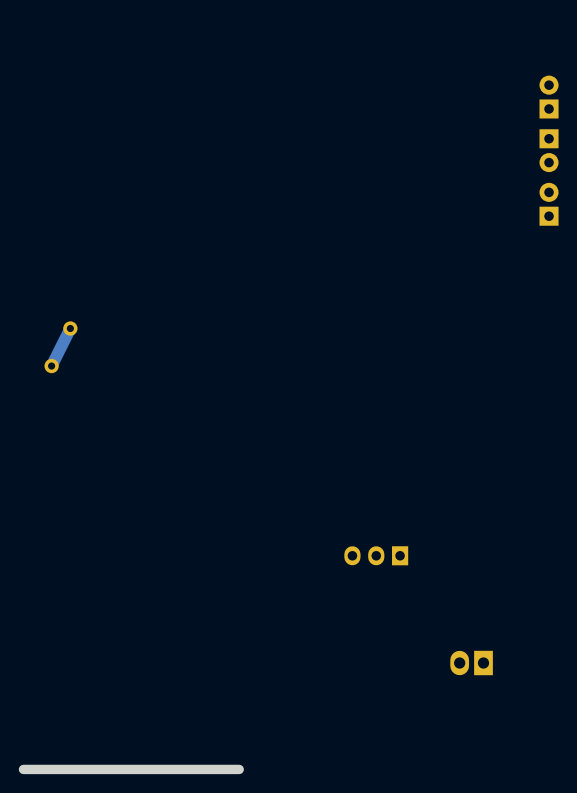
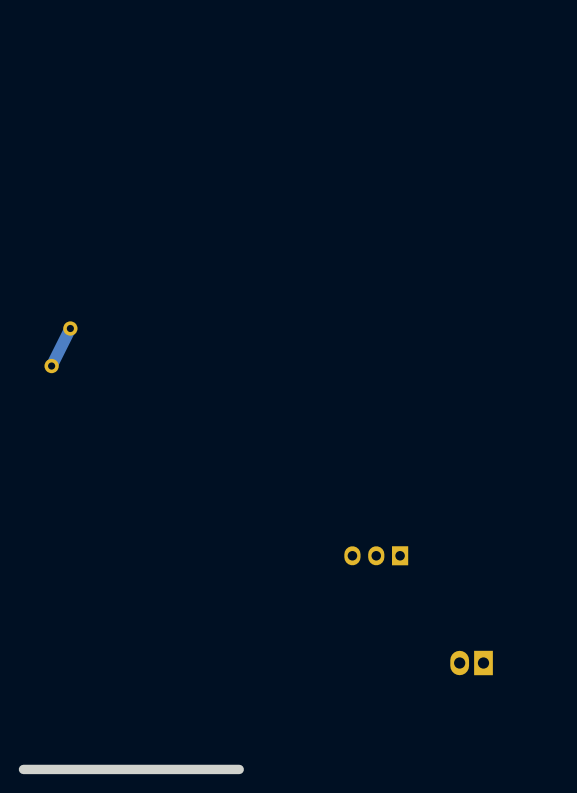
part: (549, 97) -> none
part: (549, 150) -> none
part: (549, 204) -> none

